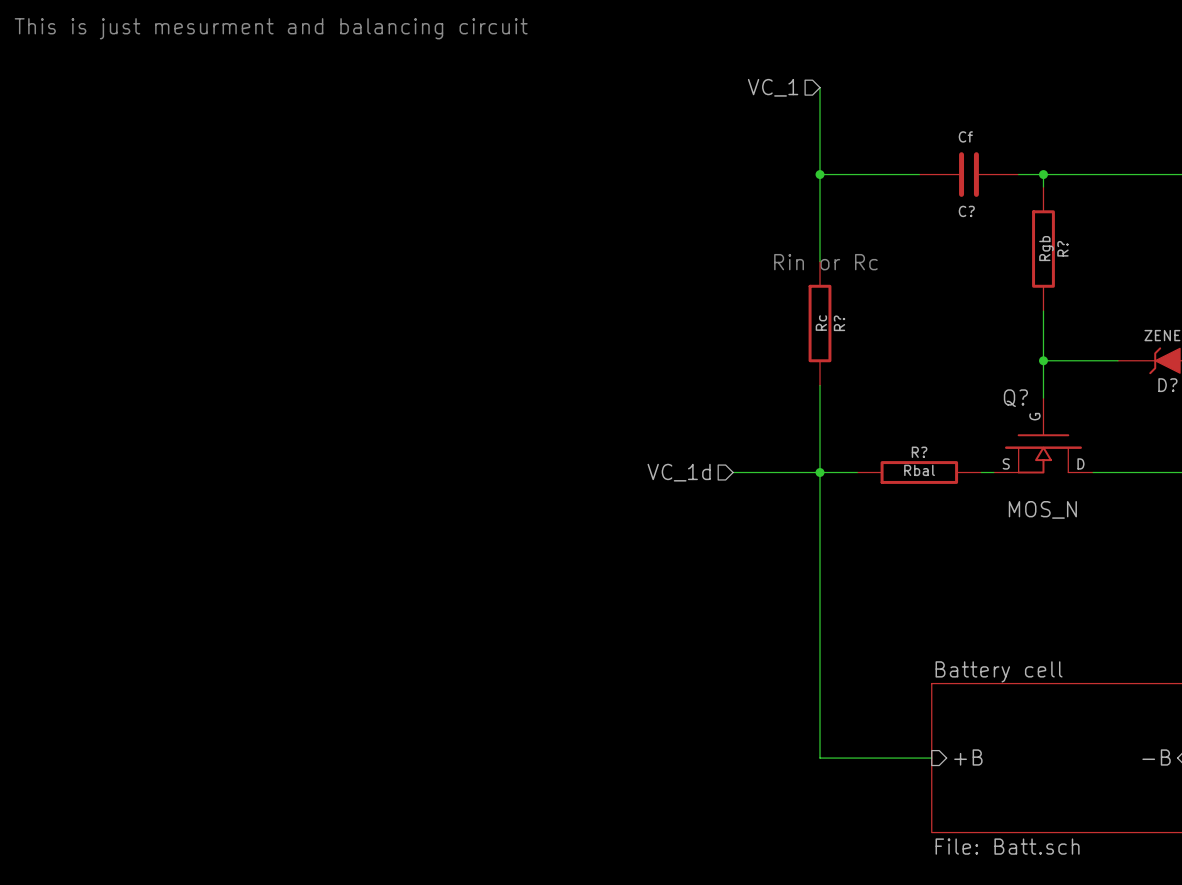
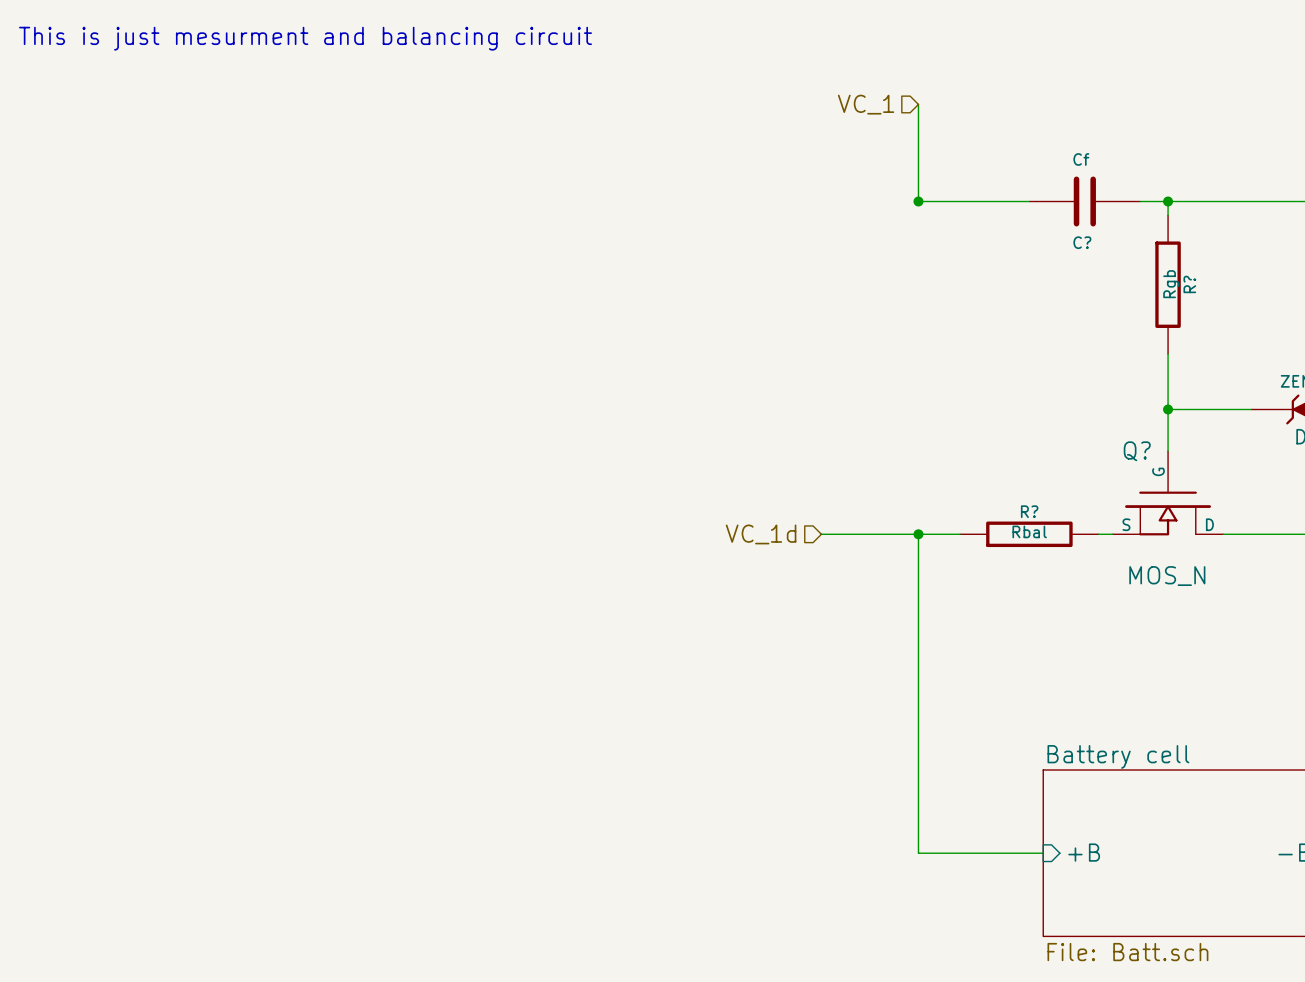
wire: (820, 174) (820, 261) -> none
text: Rin or Rc (825, 262) -> none
R?: Rc (820, 323) -> none
wire: (820, 385) (820, 472) -> none

